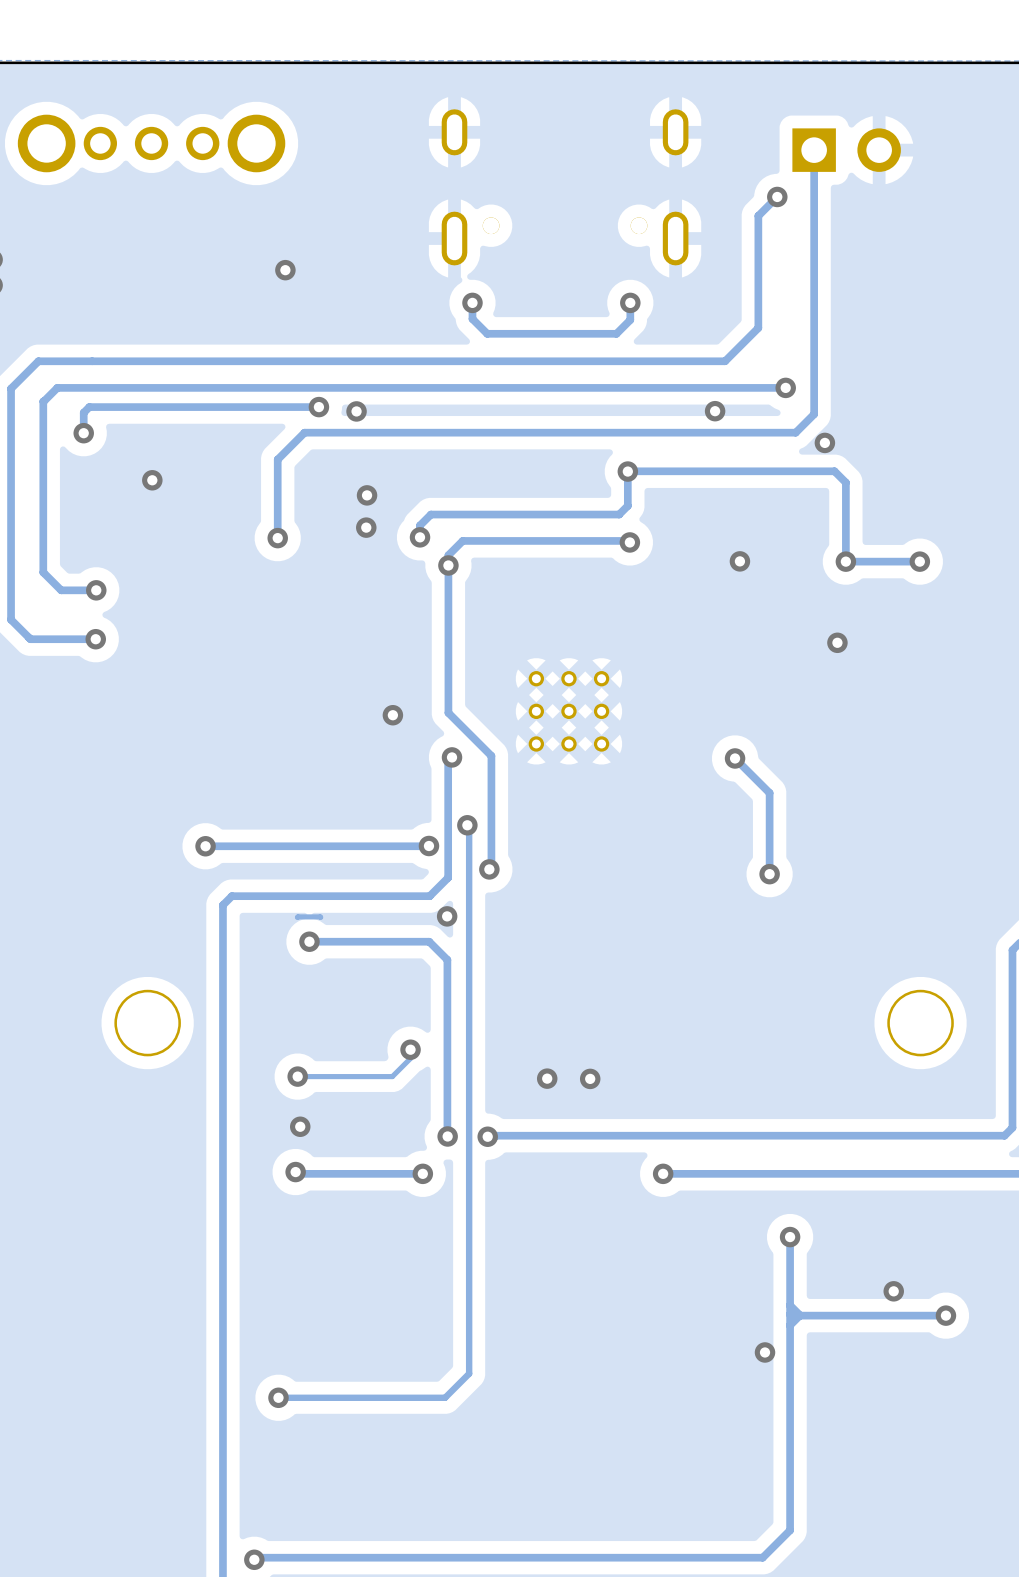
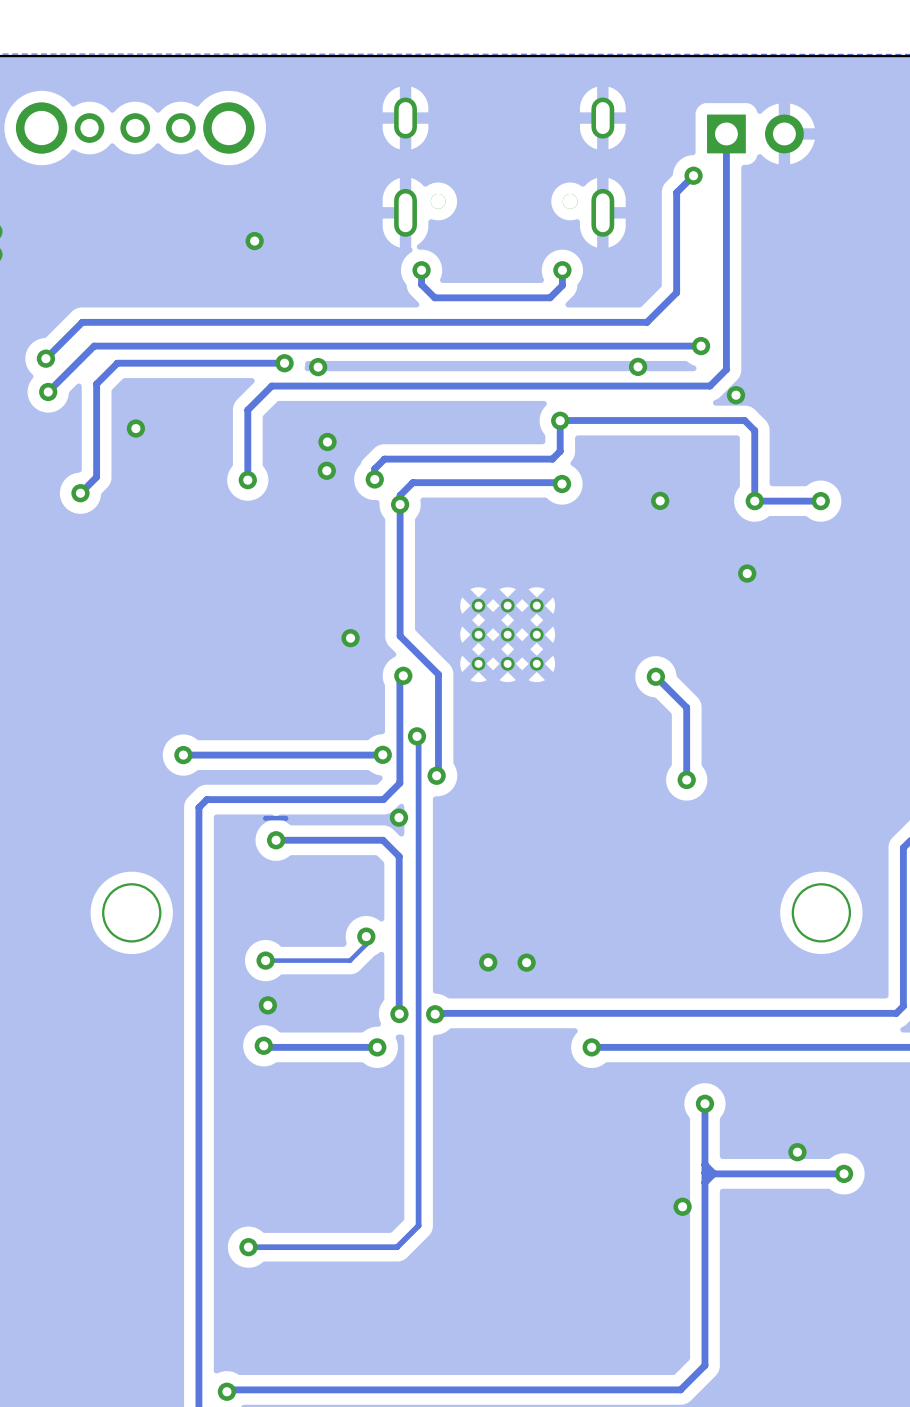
track: (92, 361) (38, 361) (11, 388) (11, 619) (30, 639) (95, 639) -> (82, 322) (45, 358)
track: (105, 387) (57, 387) (43, 401) -> (94, 346) (48, 392)
track: (43, 401) (43, 572) (61, 590) (96, 590) -> none
via: none -> (45, 358)
track: (131, 407) (89, 407) (83, 412) (83, 433) -> (117, 363) (96, 384) (96, 477) (80, 493)
via: (83, 433) -> none
via: none -> (48, 392)
via position: (96, 590) -> (80, 493)
via: (95, 639) -> none

